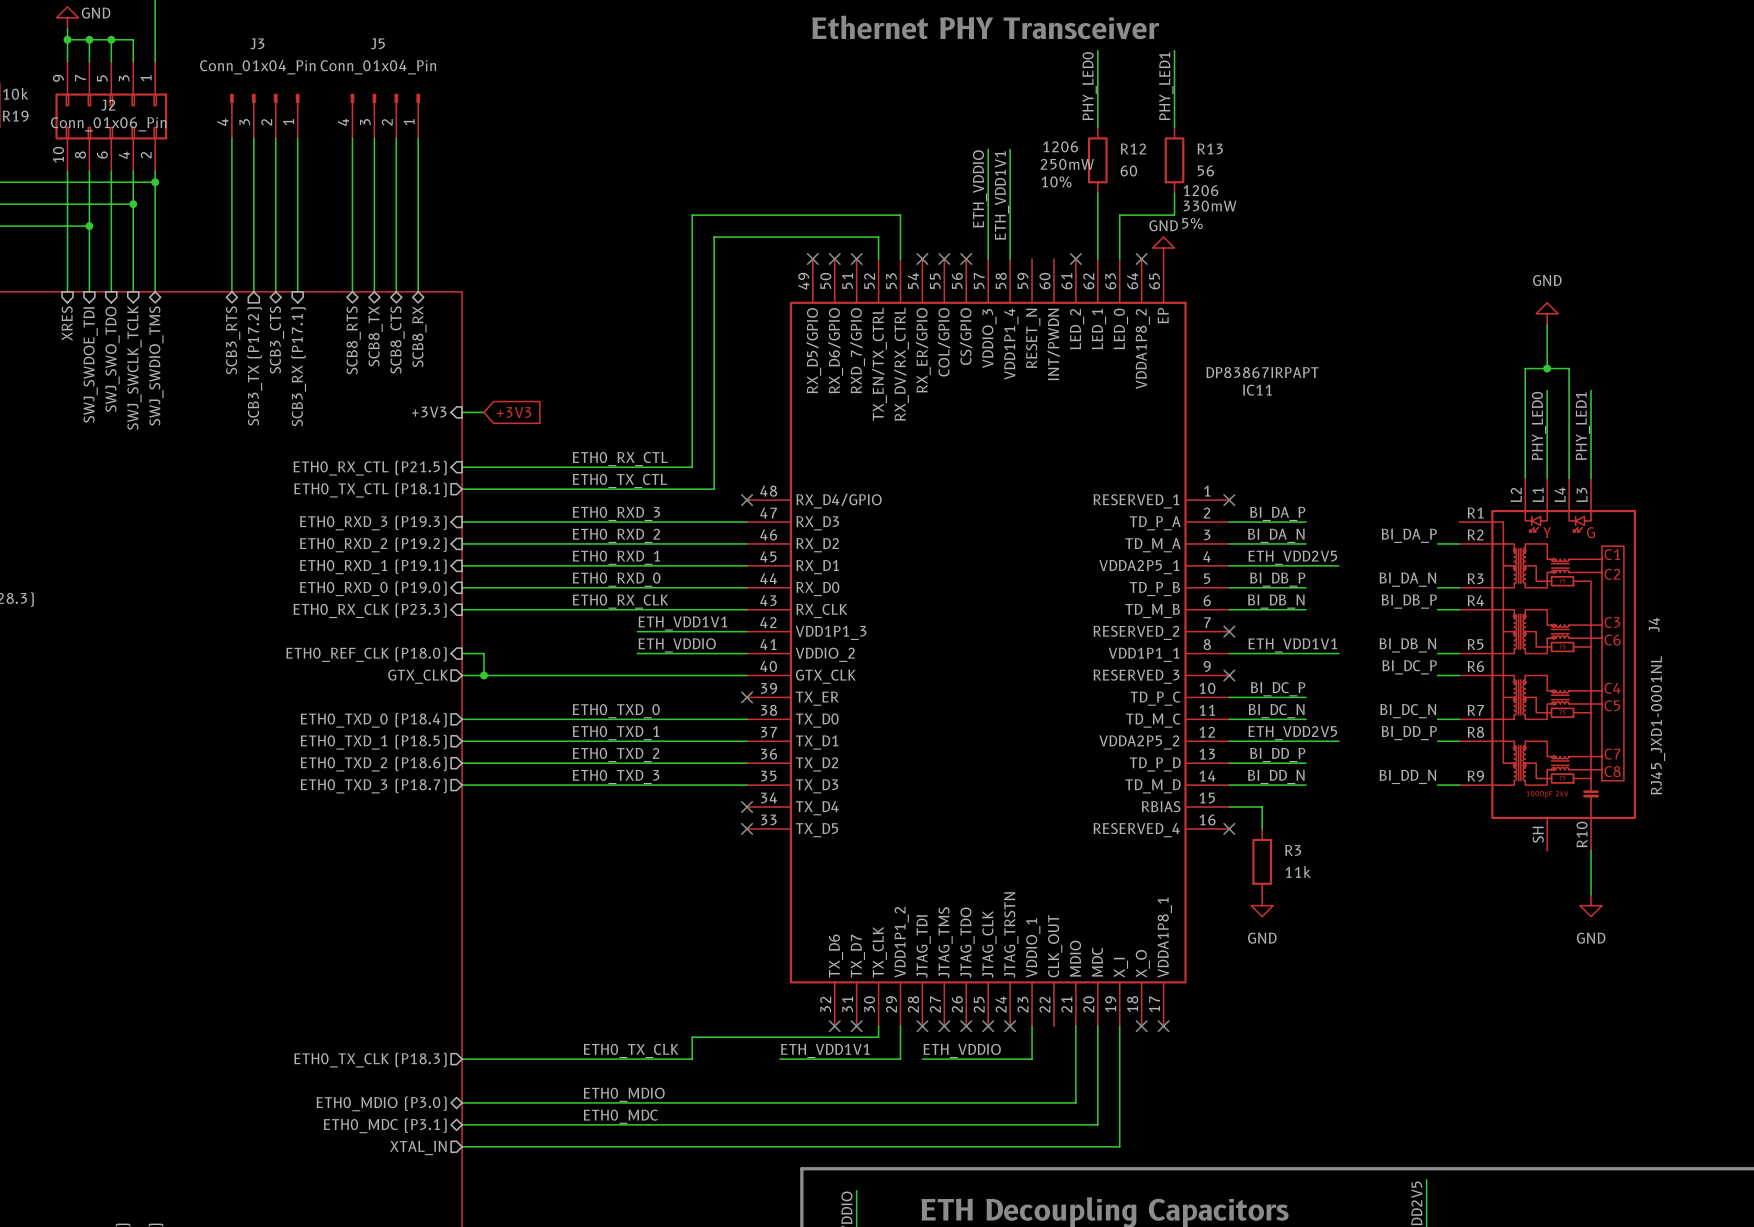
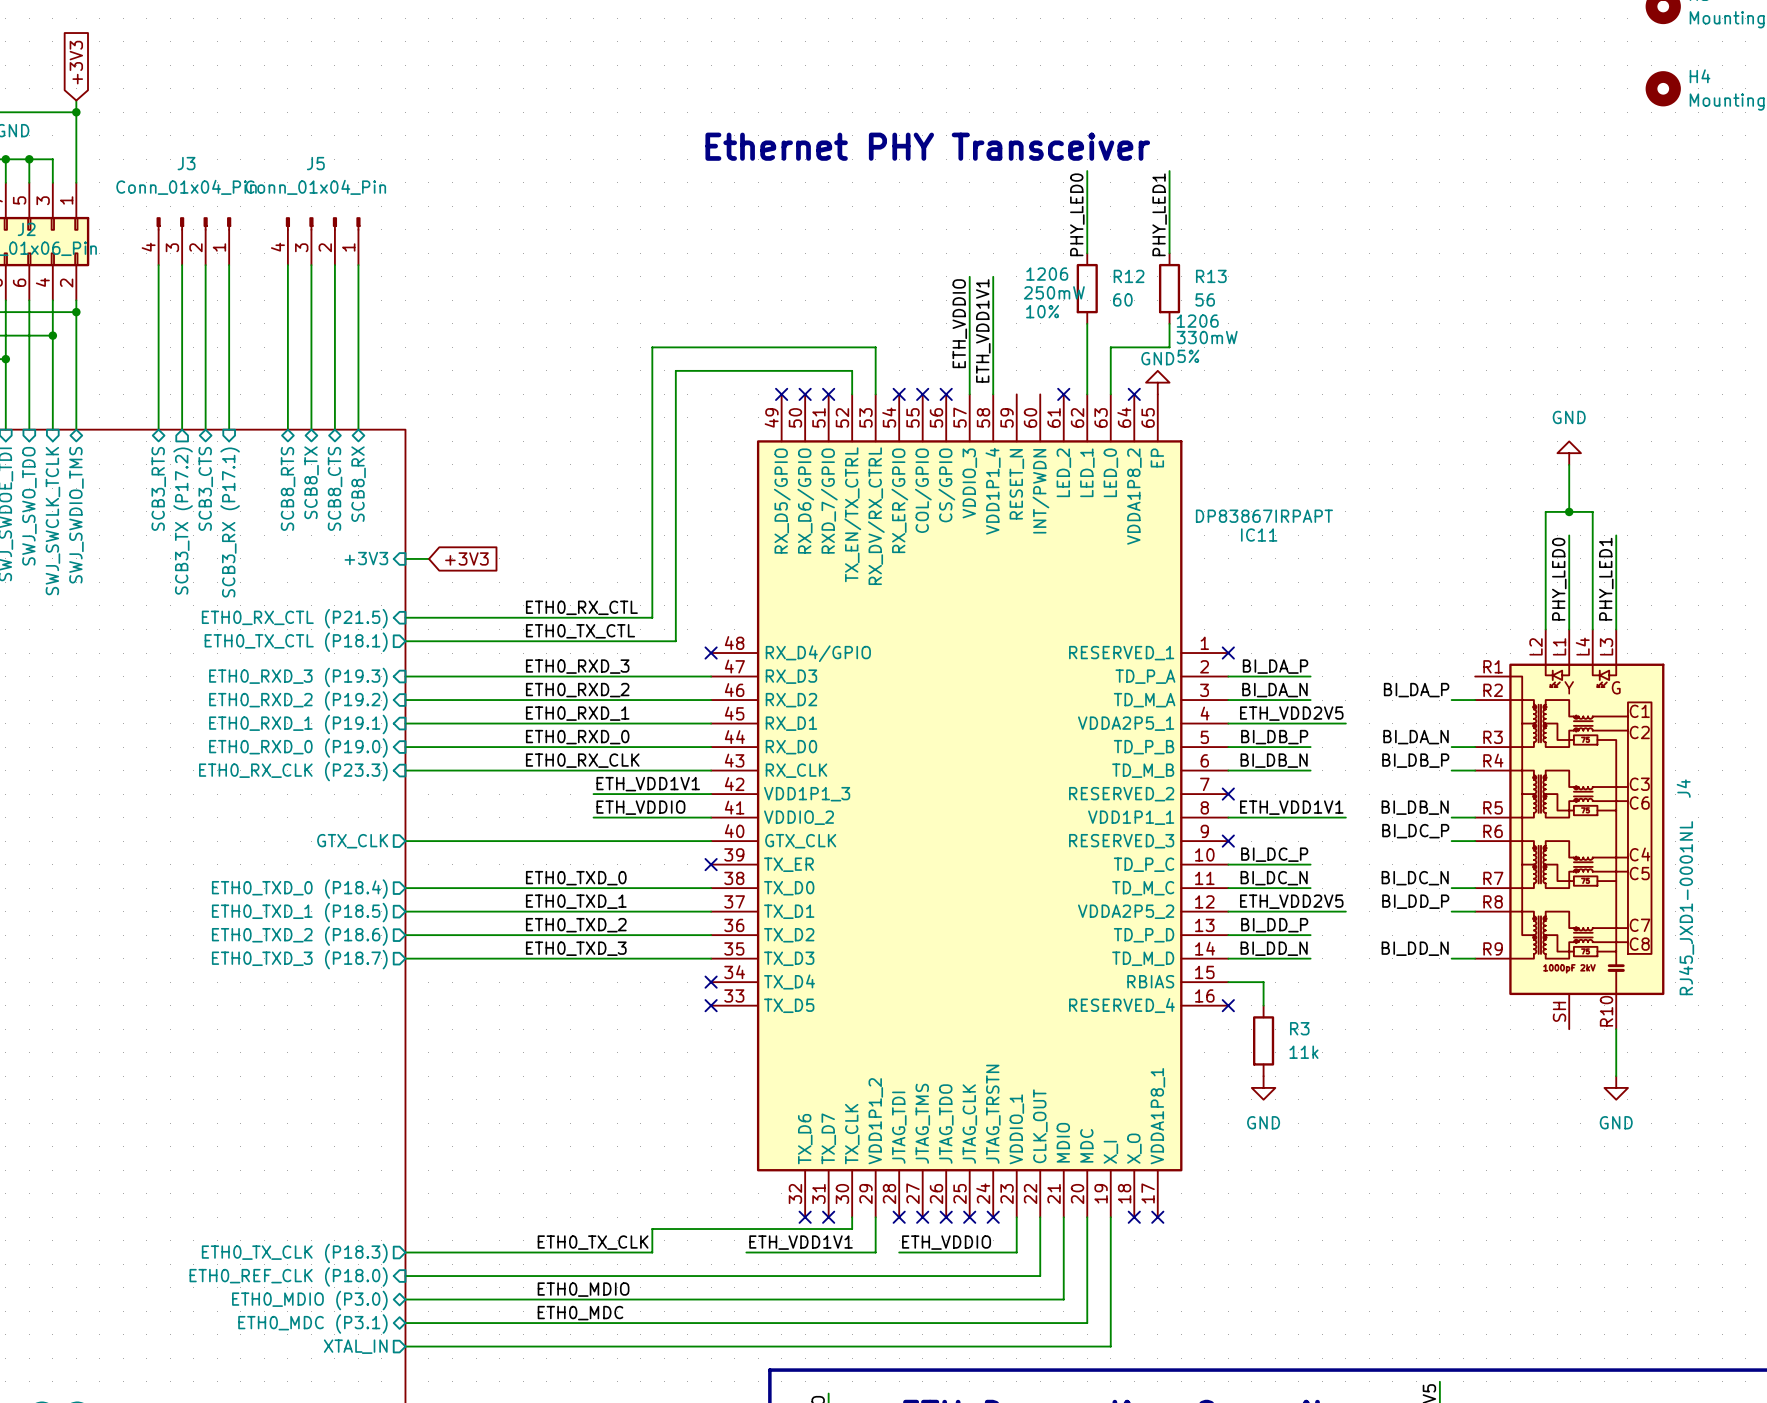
wire: (462, 653) (483, 653) (483, 675) -> none
sheet pin: ETH0_REF_CLK (P18.0) (366, 654) -> none
junction: (483, 675) -> none
wire: none -> (1040, 1217) (1040, 1276) (405, 1276)
sheet pin: none -> ETH0_REF_CLK (P18.0) (288, 1276)

